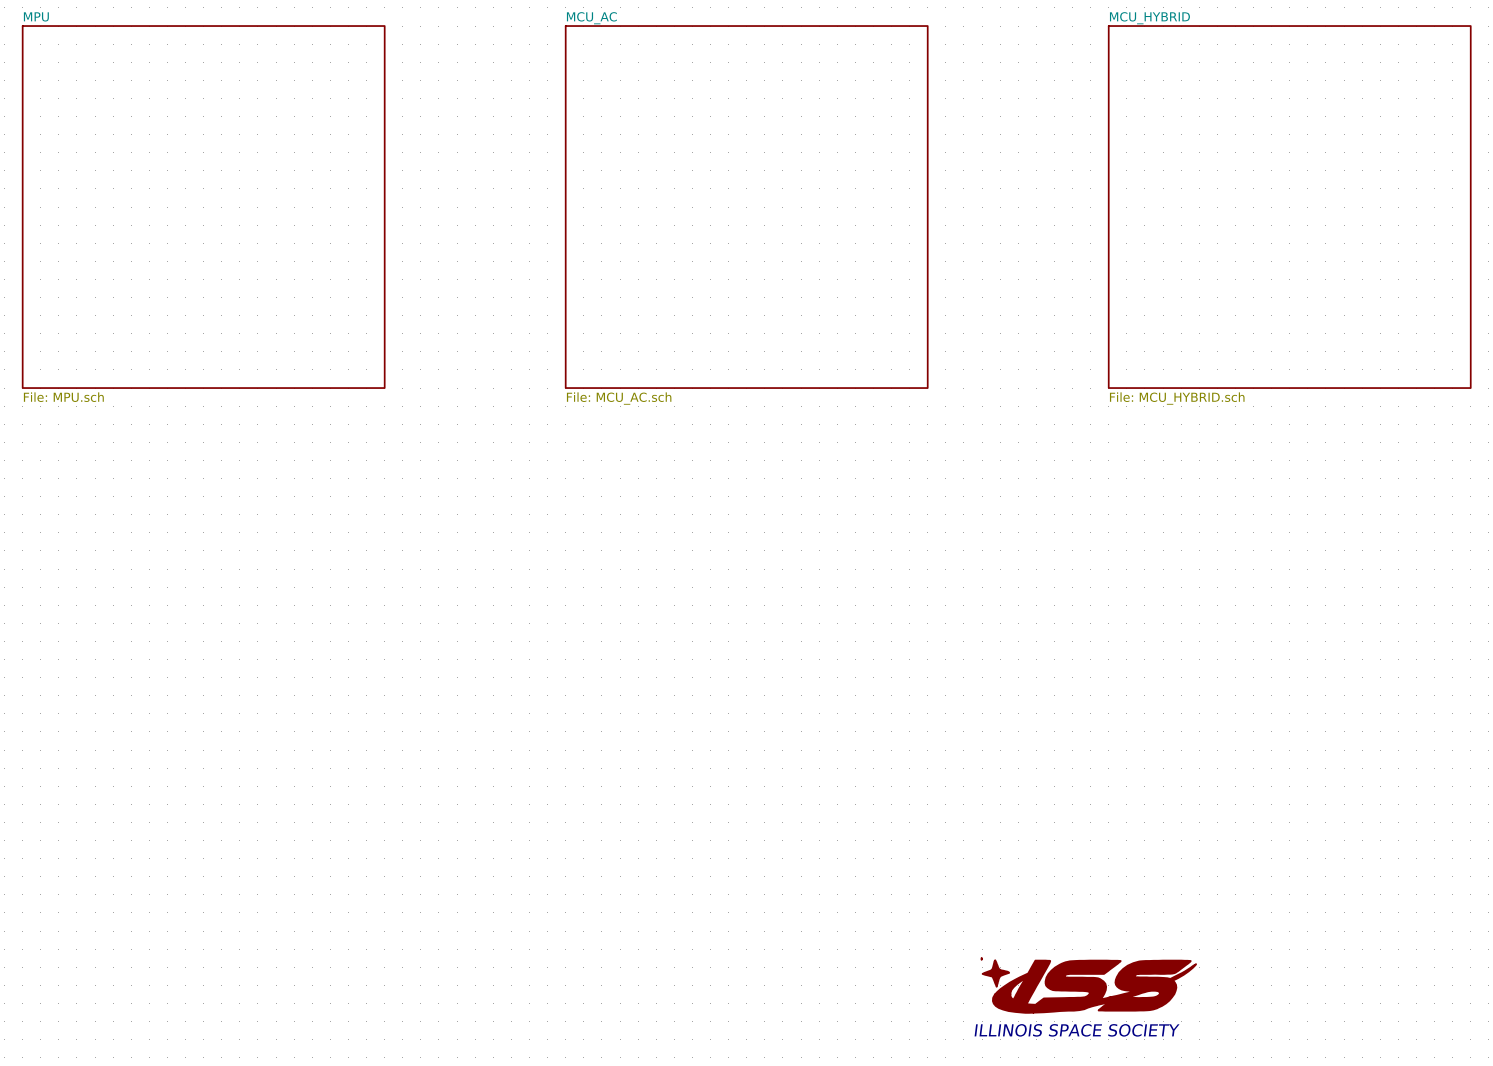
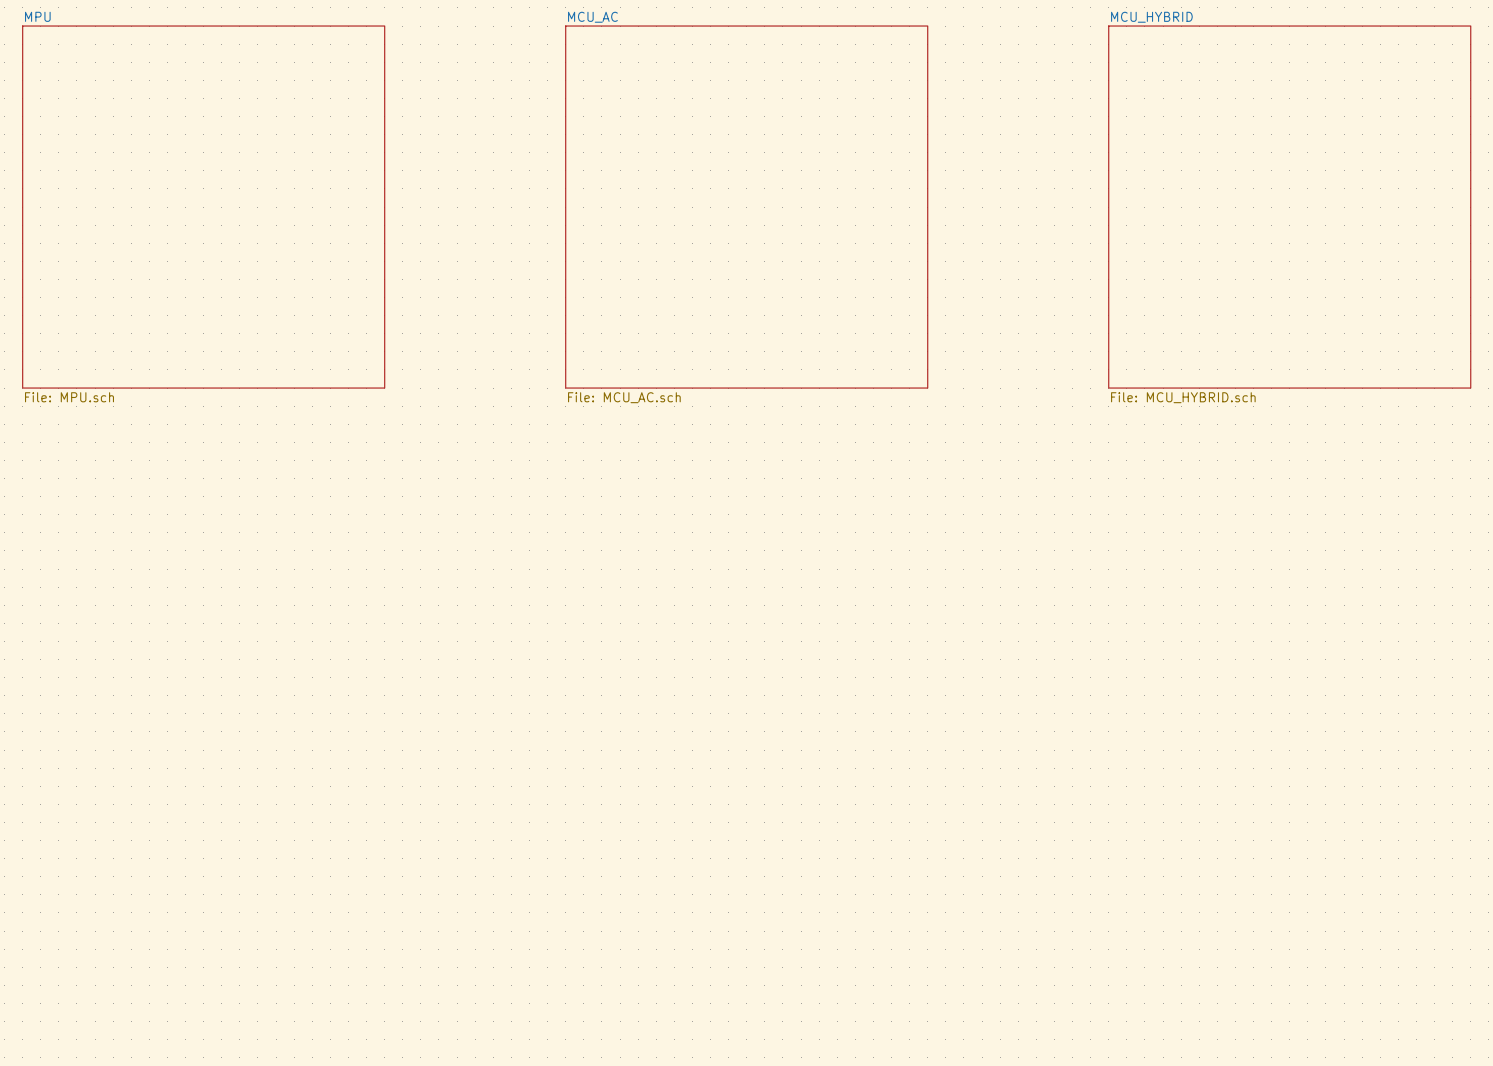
power symbol: (1088, 985) -> none
text: ILLINOIS SPACE SOCIETY (1077, 1030) -> none

